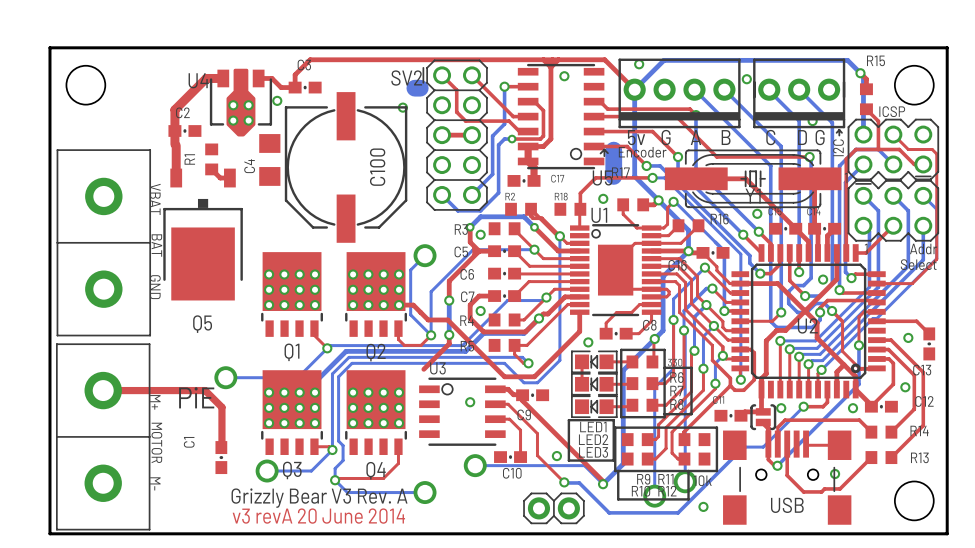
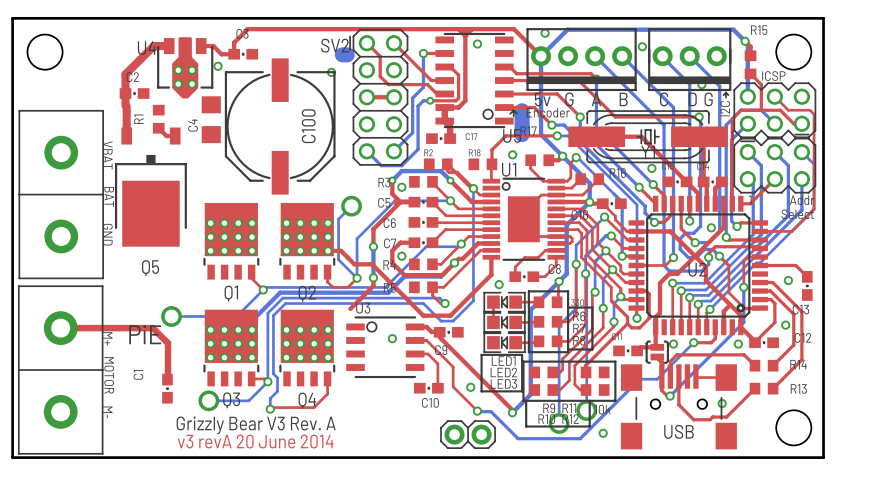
bottom track: (475, 465) (584, 465) (603, 484) -> none
via: (475, 465) -> none
bottom track: (335, 480) (347, 492) (425, 492) -> none
via: (425, 492) -> none

